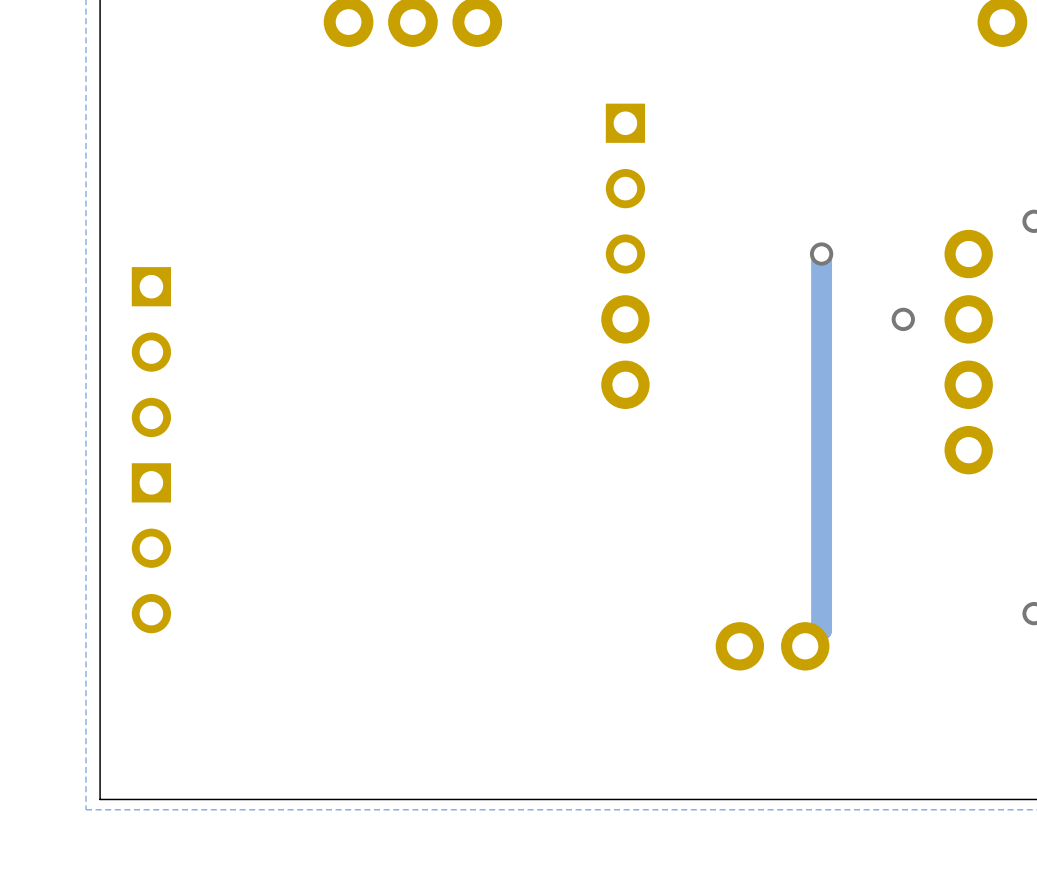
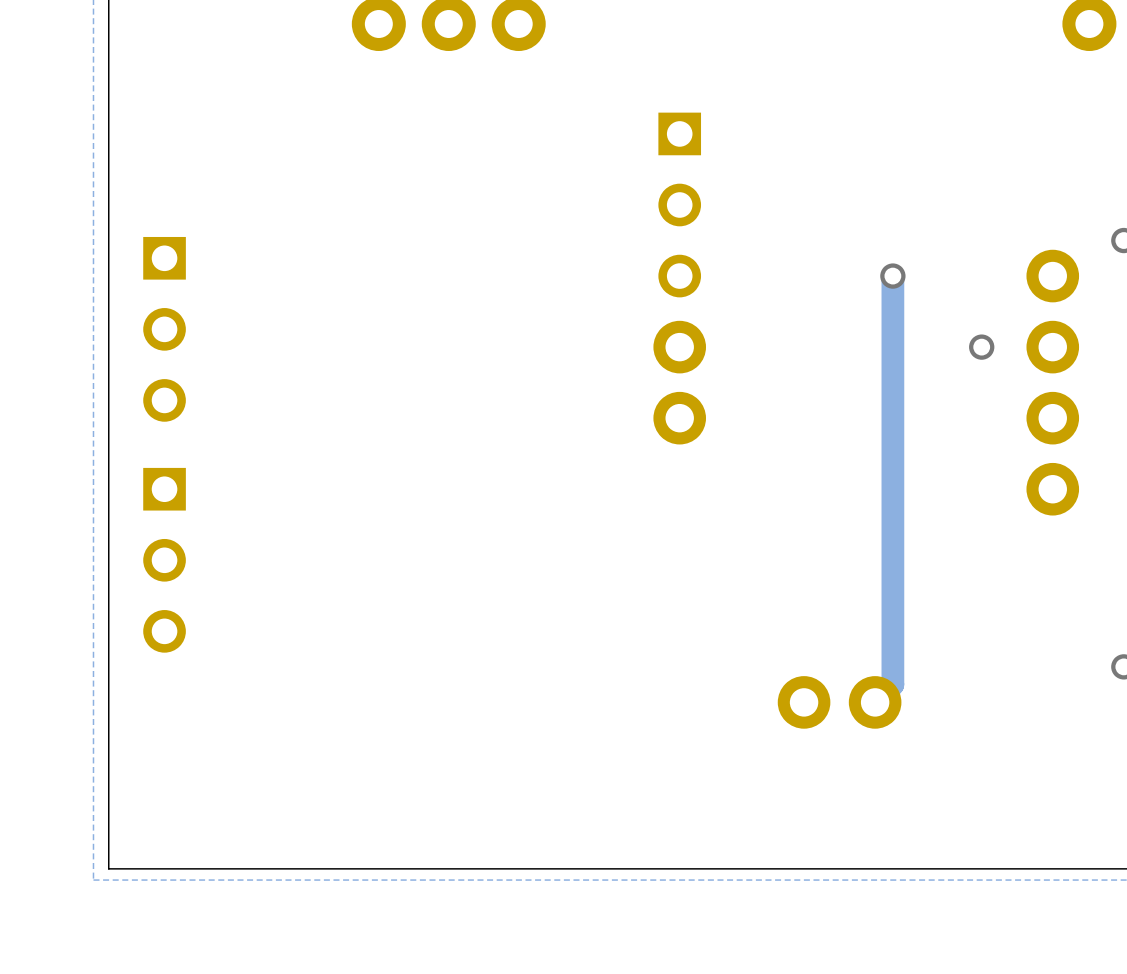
part position: (151, 352) -> (164, 329)
part position: (151, 548) -> (164, 560)

